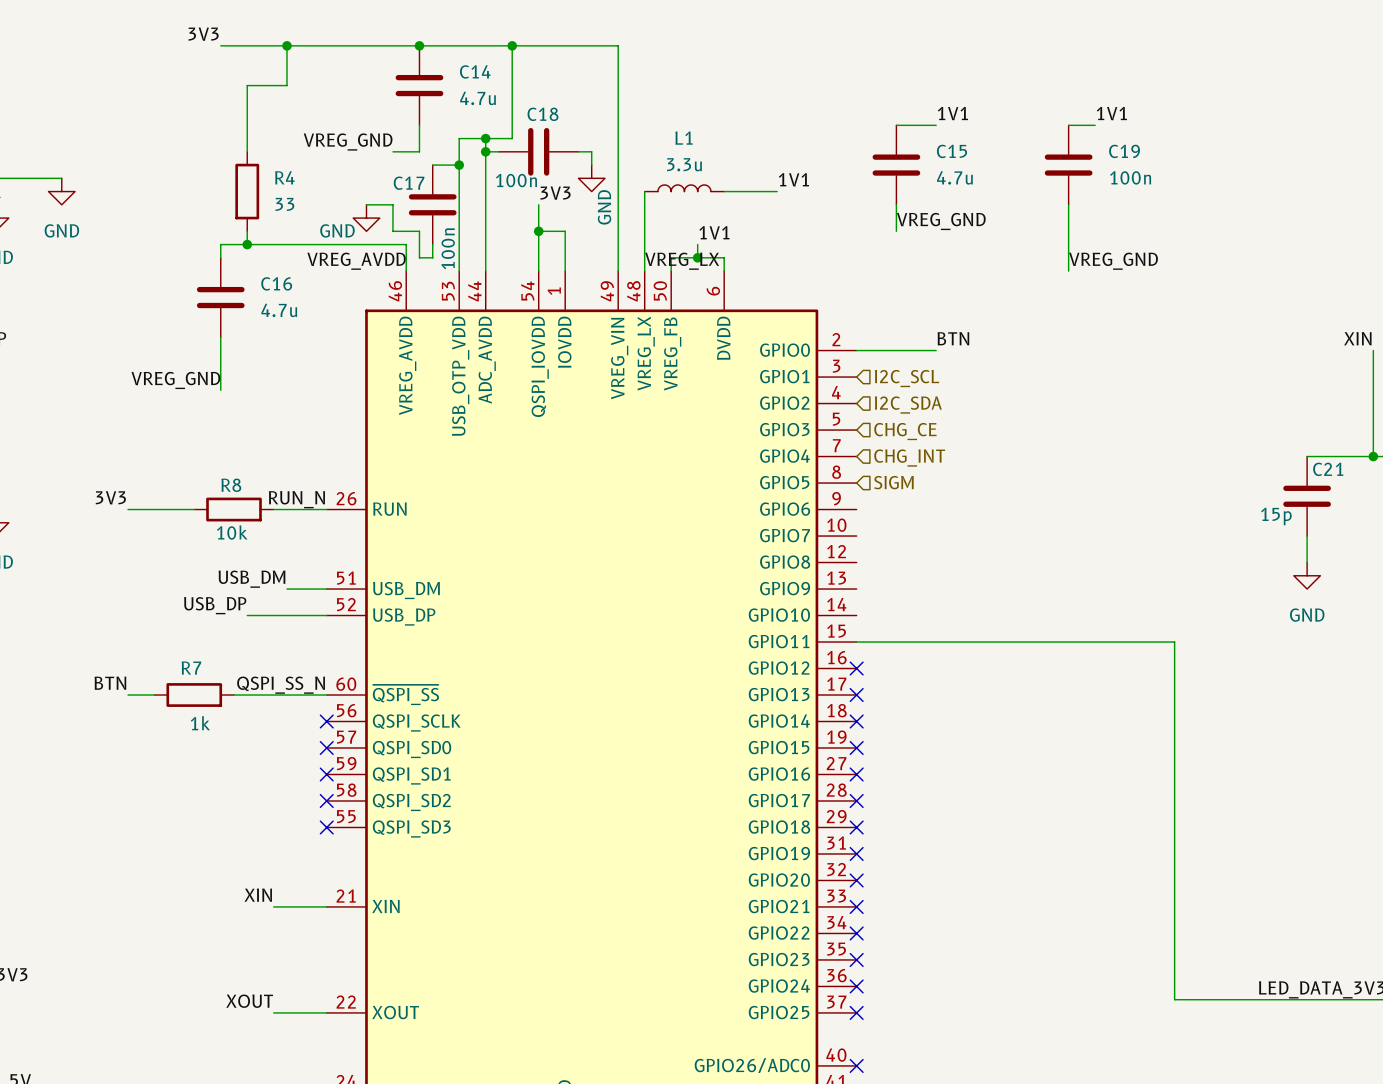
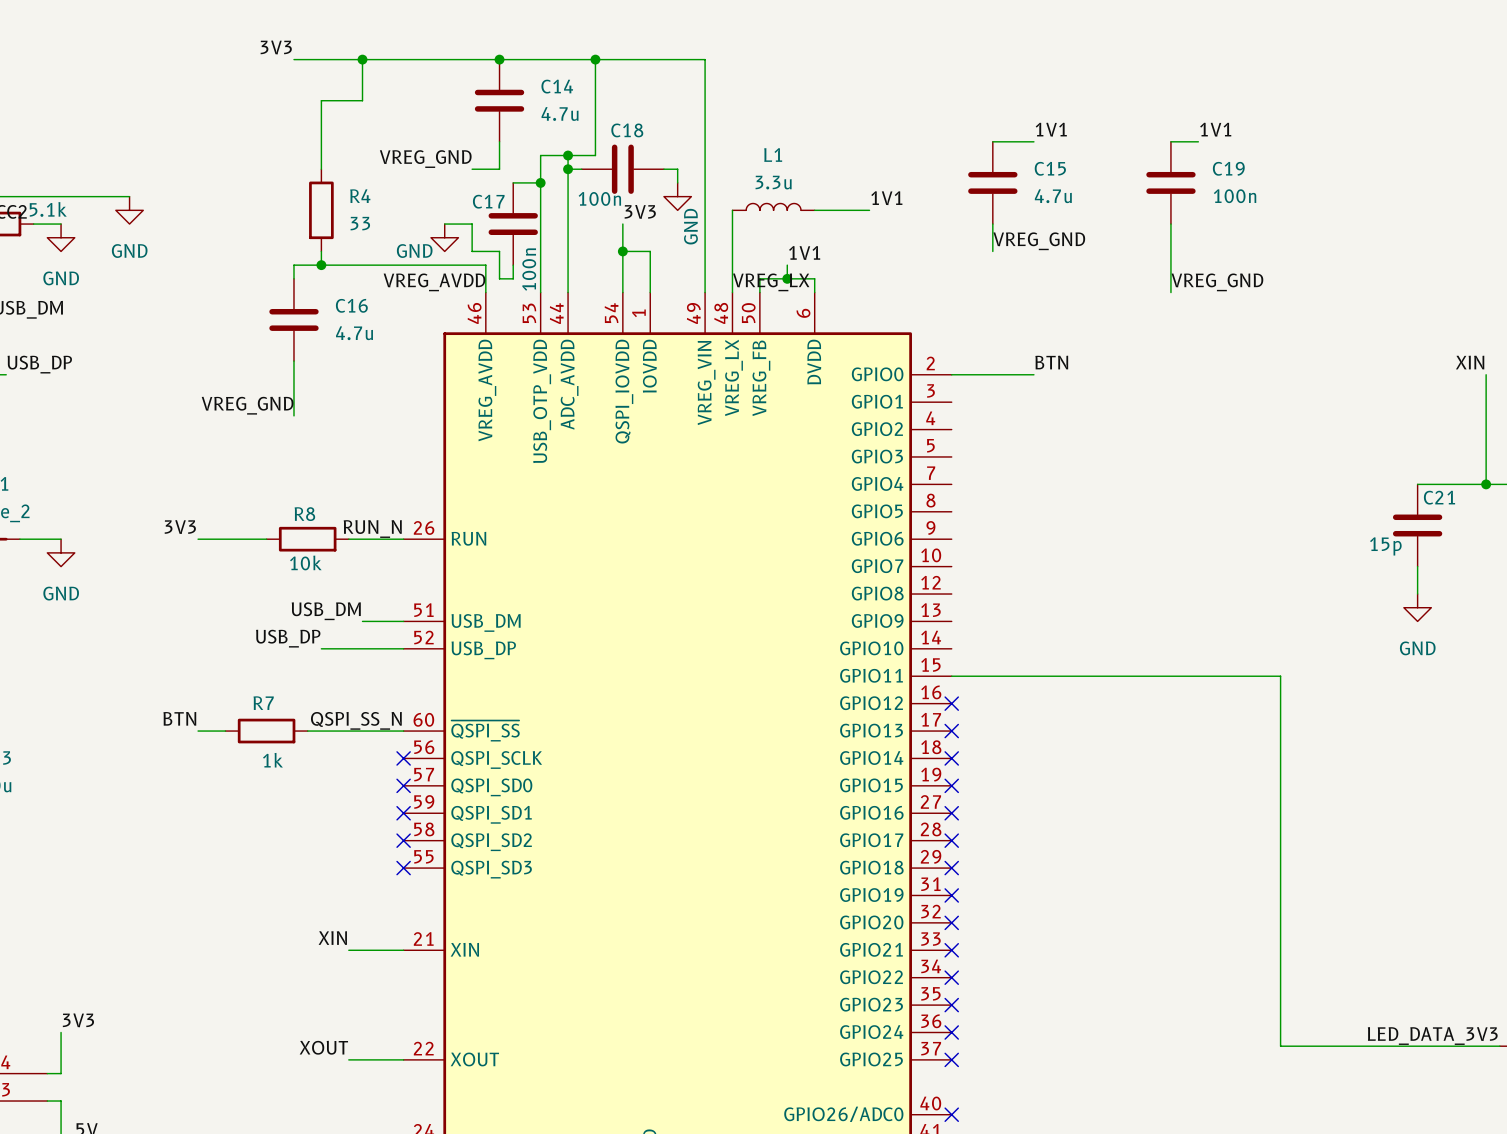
hierarchical label: I2C_SCL (907, 378) -> none
hierarchical label: I2C_SDA (908, 405) -> none
hierarchical label: CHG_CE (905, 431) -> none
hierarchical label: CHG_INT (909, 458) -> none
hierarchical label: SIGM (893, 482) -> none

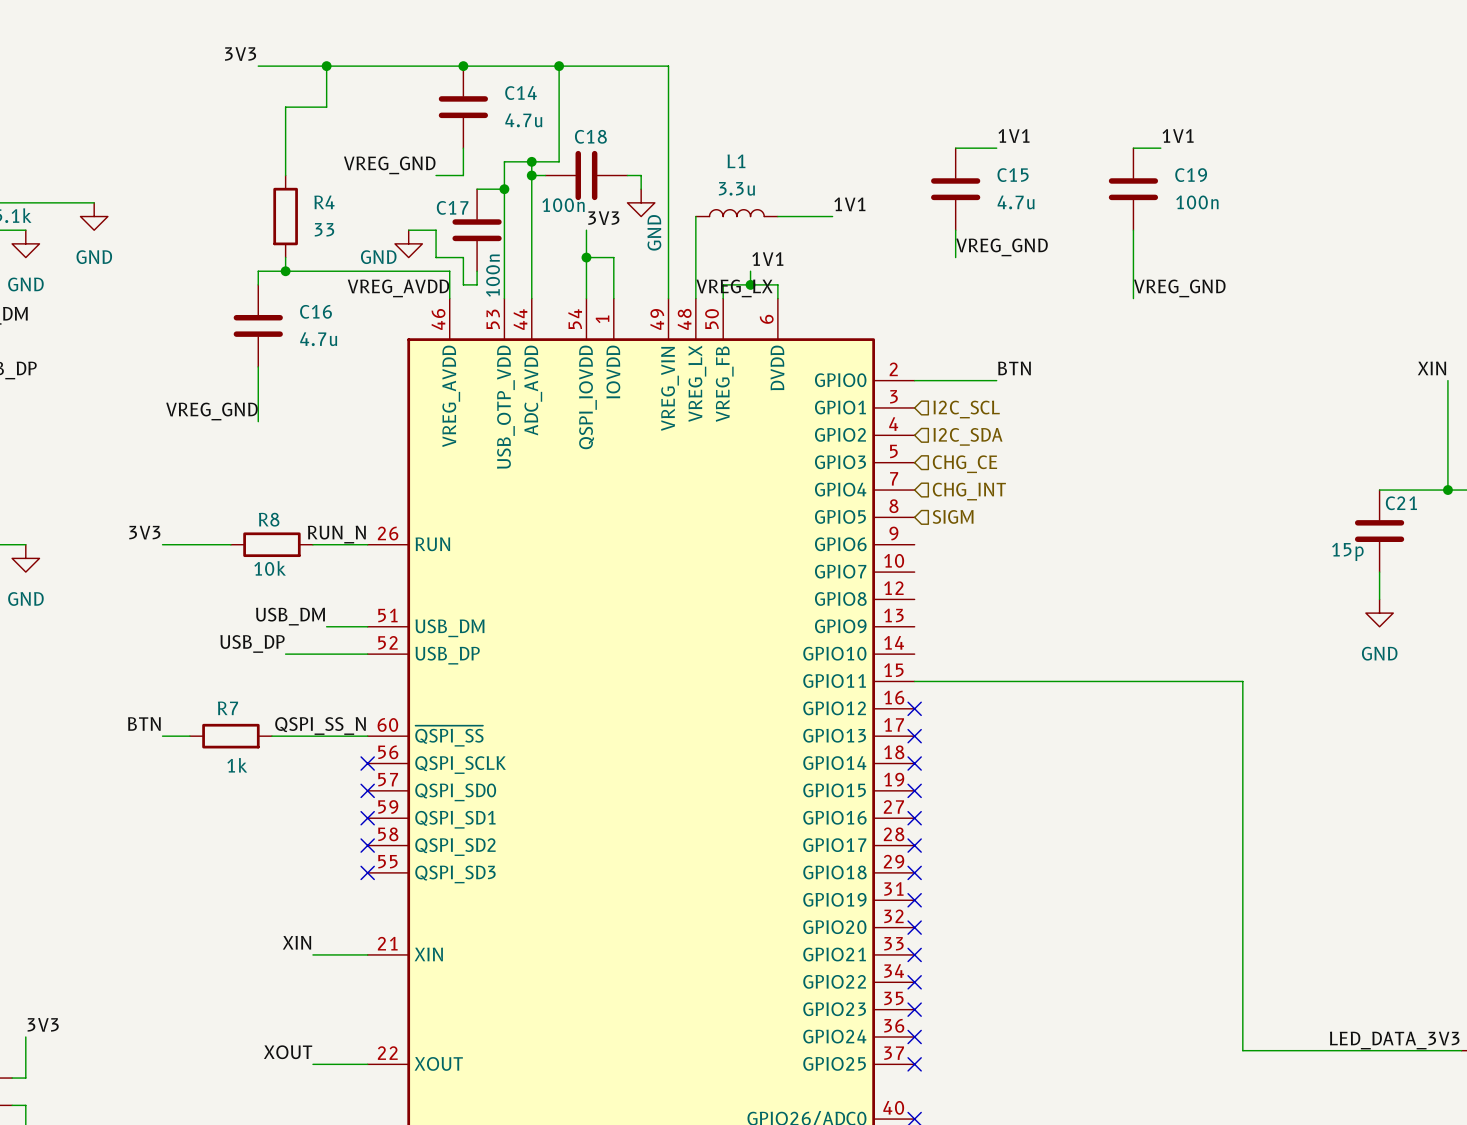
hierarchical label: none -> I2C_SCL (966, 409)
hierarchical label: none -> I2C_SDA (967, 436)
hierarchical label: none -> CHG_CE (965, 464)
hierarchical label: none -> CHG_INT (969, 491)
hierarchical label: none -> SIGM (953, 516)

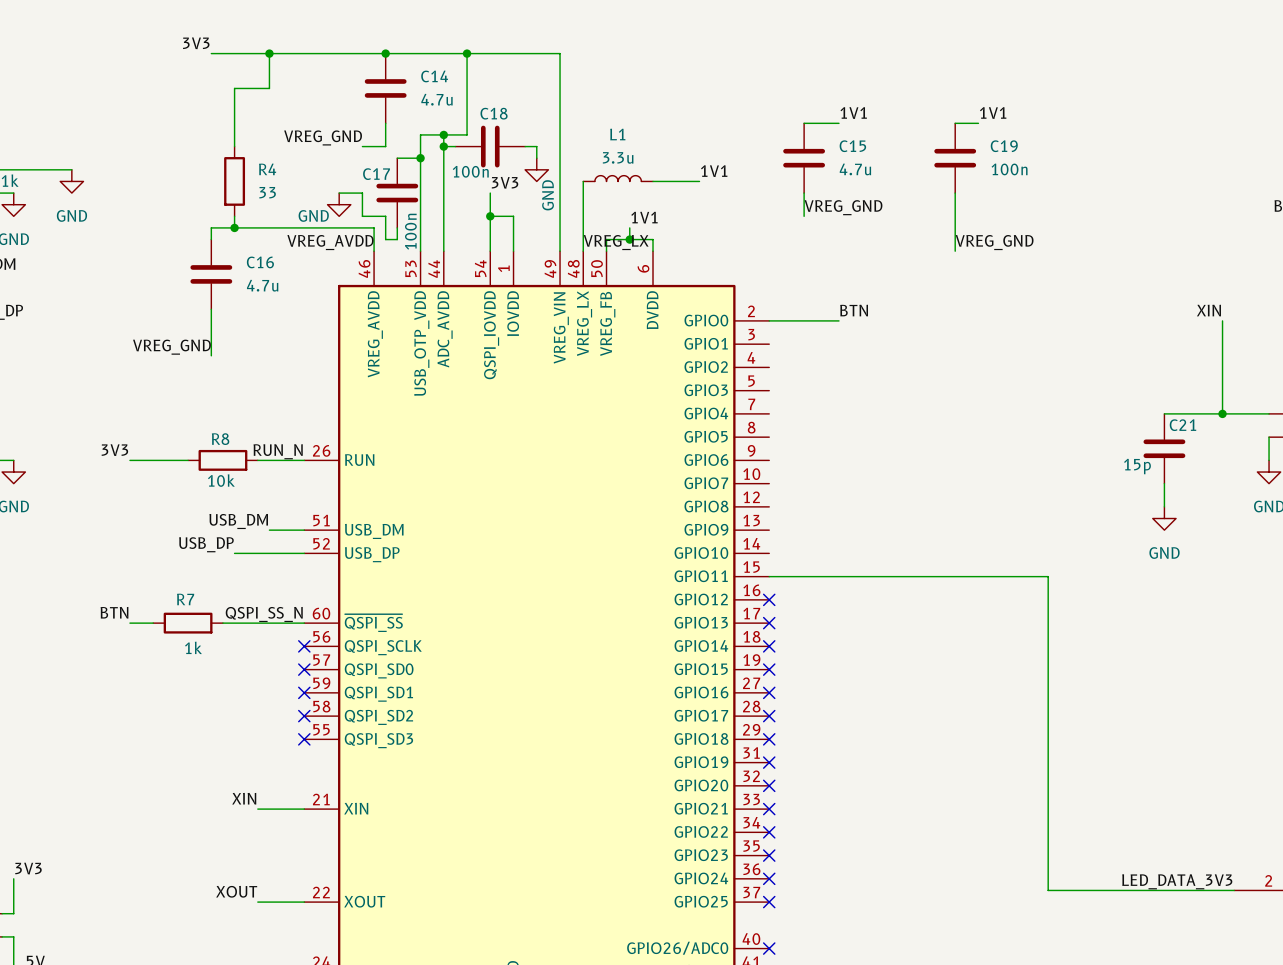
hierarchical label: I2C_SCL (966, 409) -> none
hierarchical label: I2C_SDA (967, 436) -> none
hierarchical label: CHG_CE (965, 464) -> none
hierarchical label: CHG_INT (969, 491) -> none
hierarchical label: SIGM (953, 516) -> none

